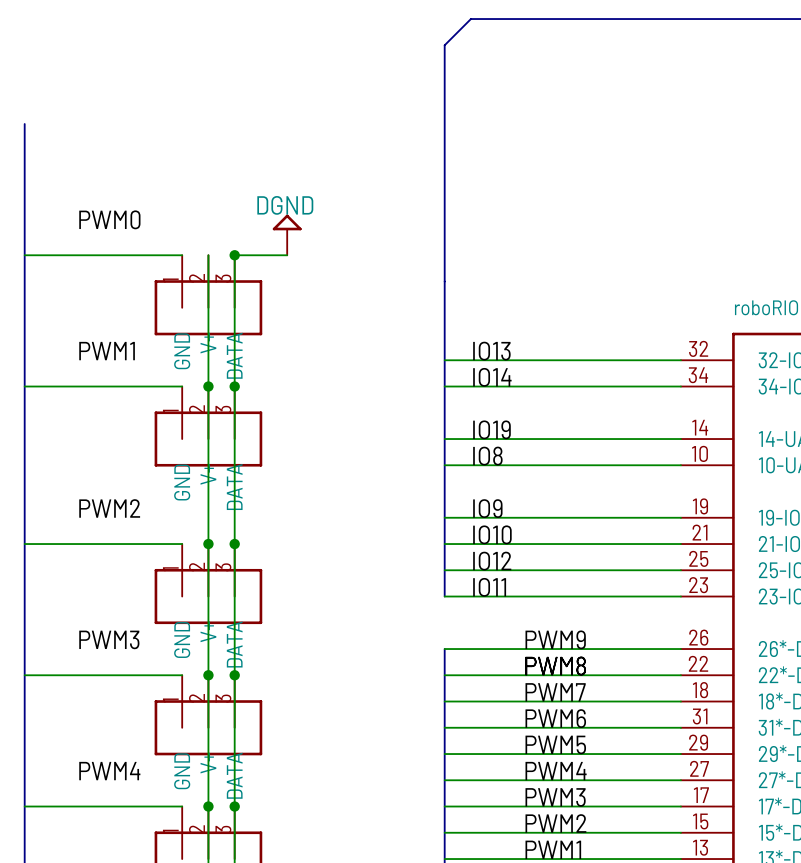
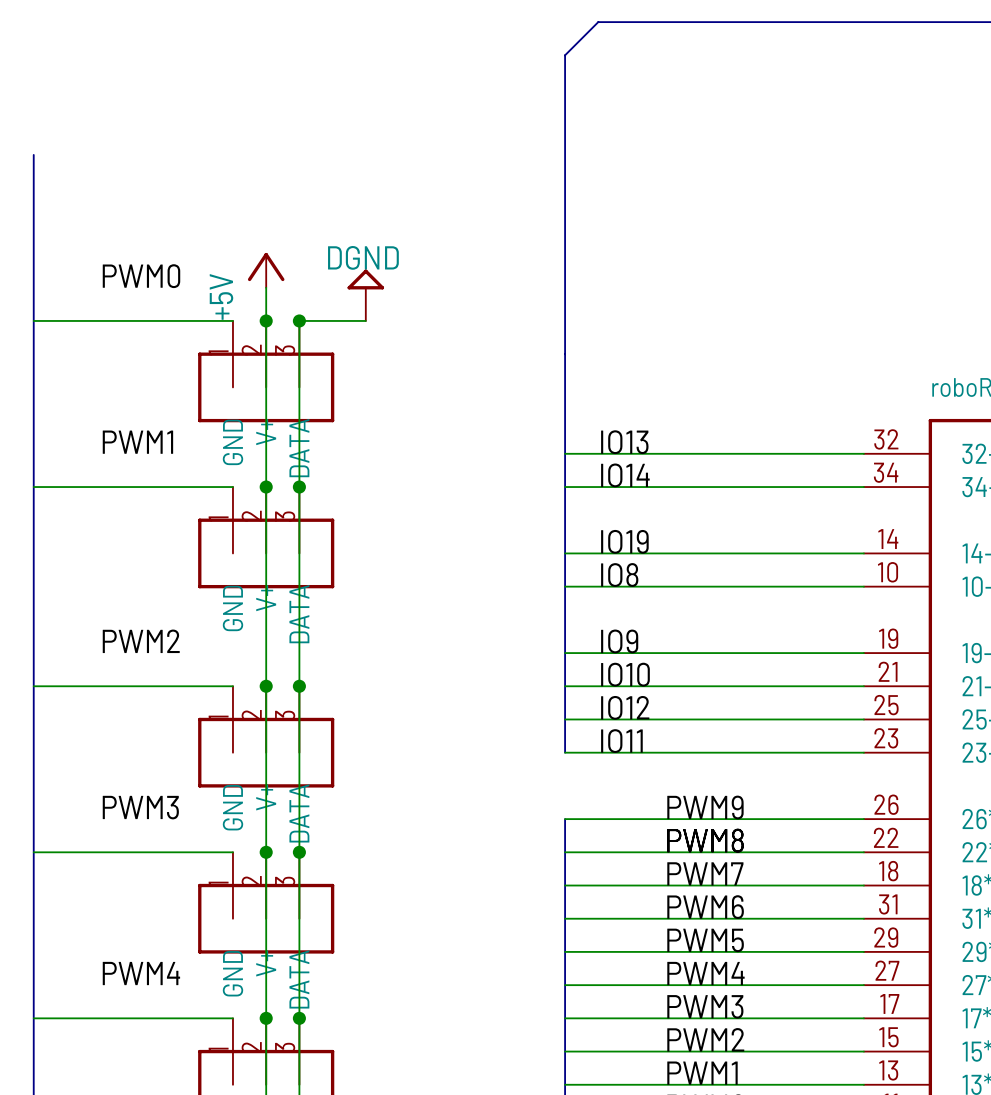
power symbol: none -> +5V (266, 270)
wire: none -> (266, 287) (266, 320)
junction: none -> (266, 320)

